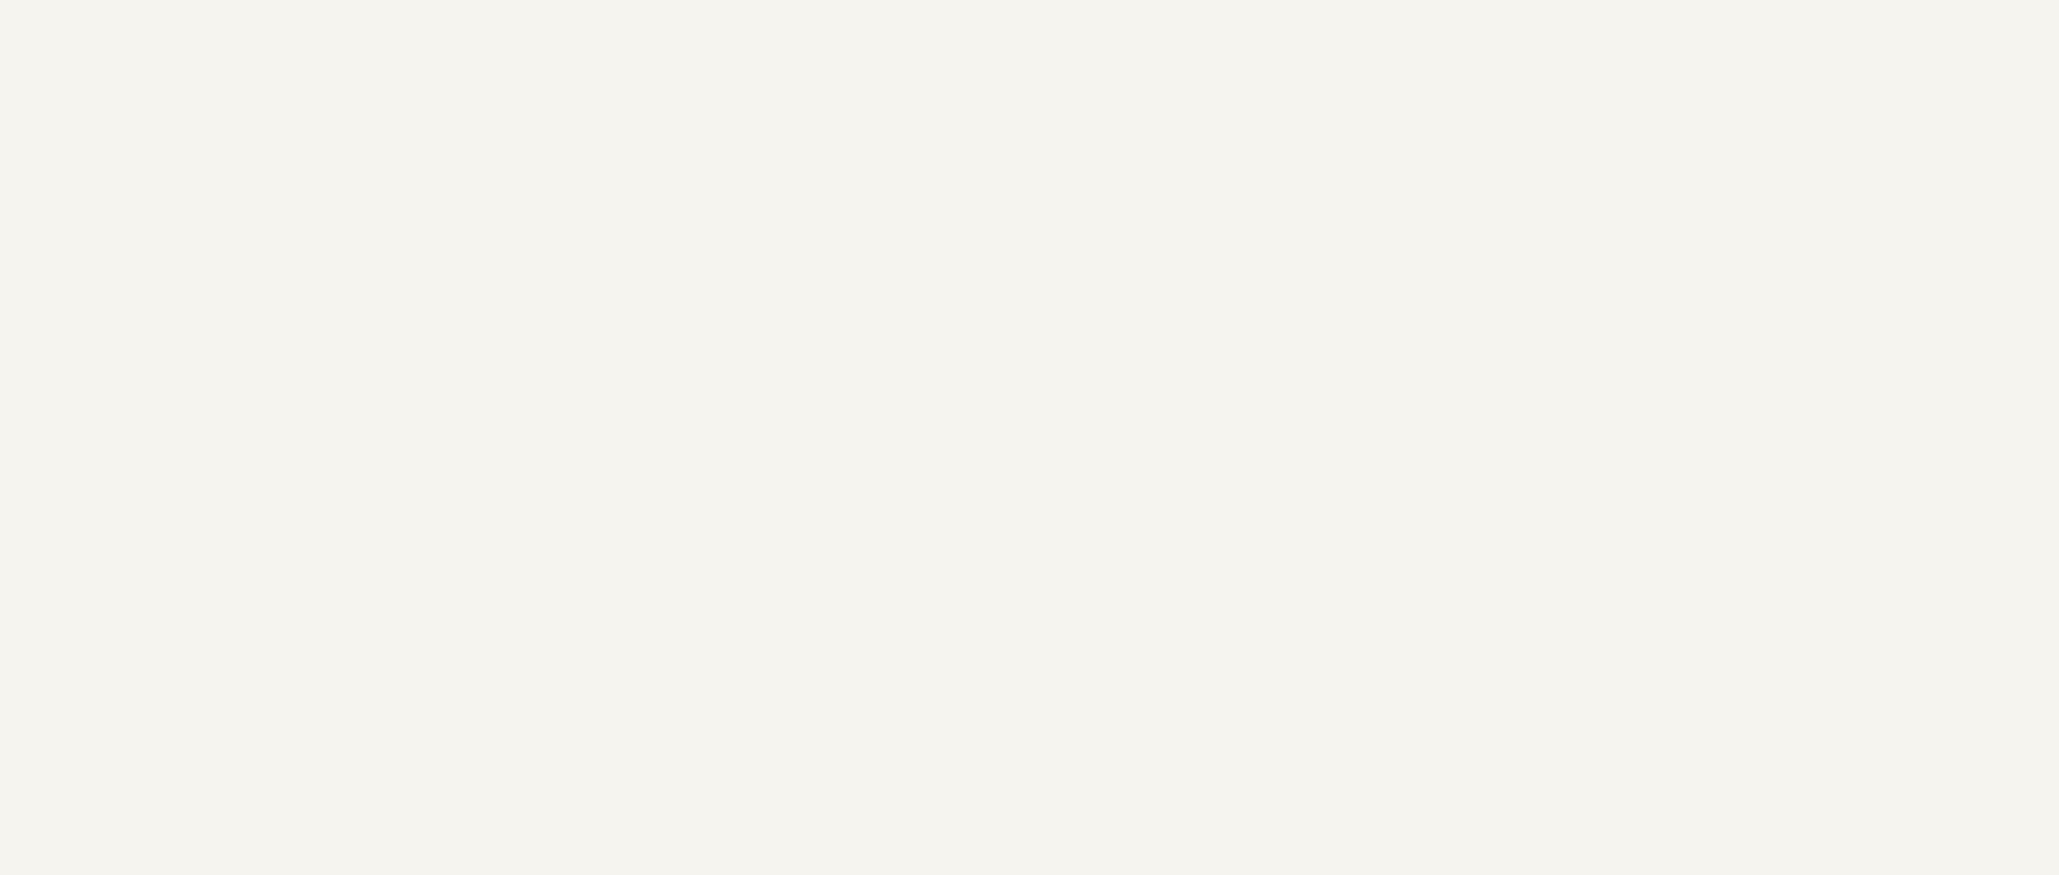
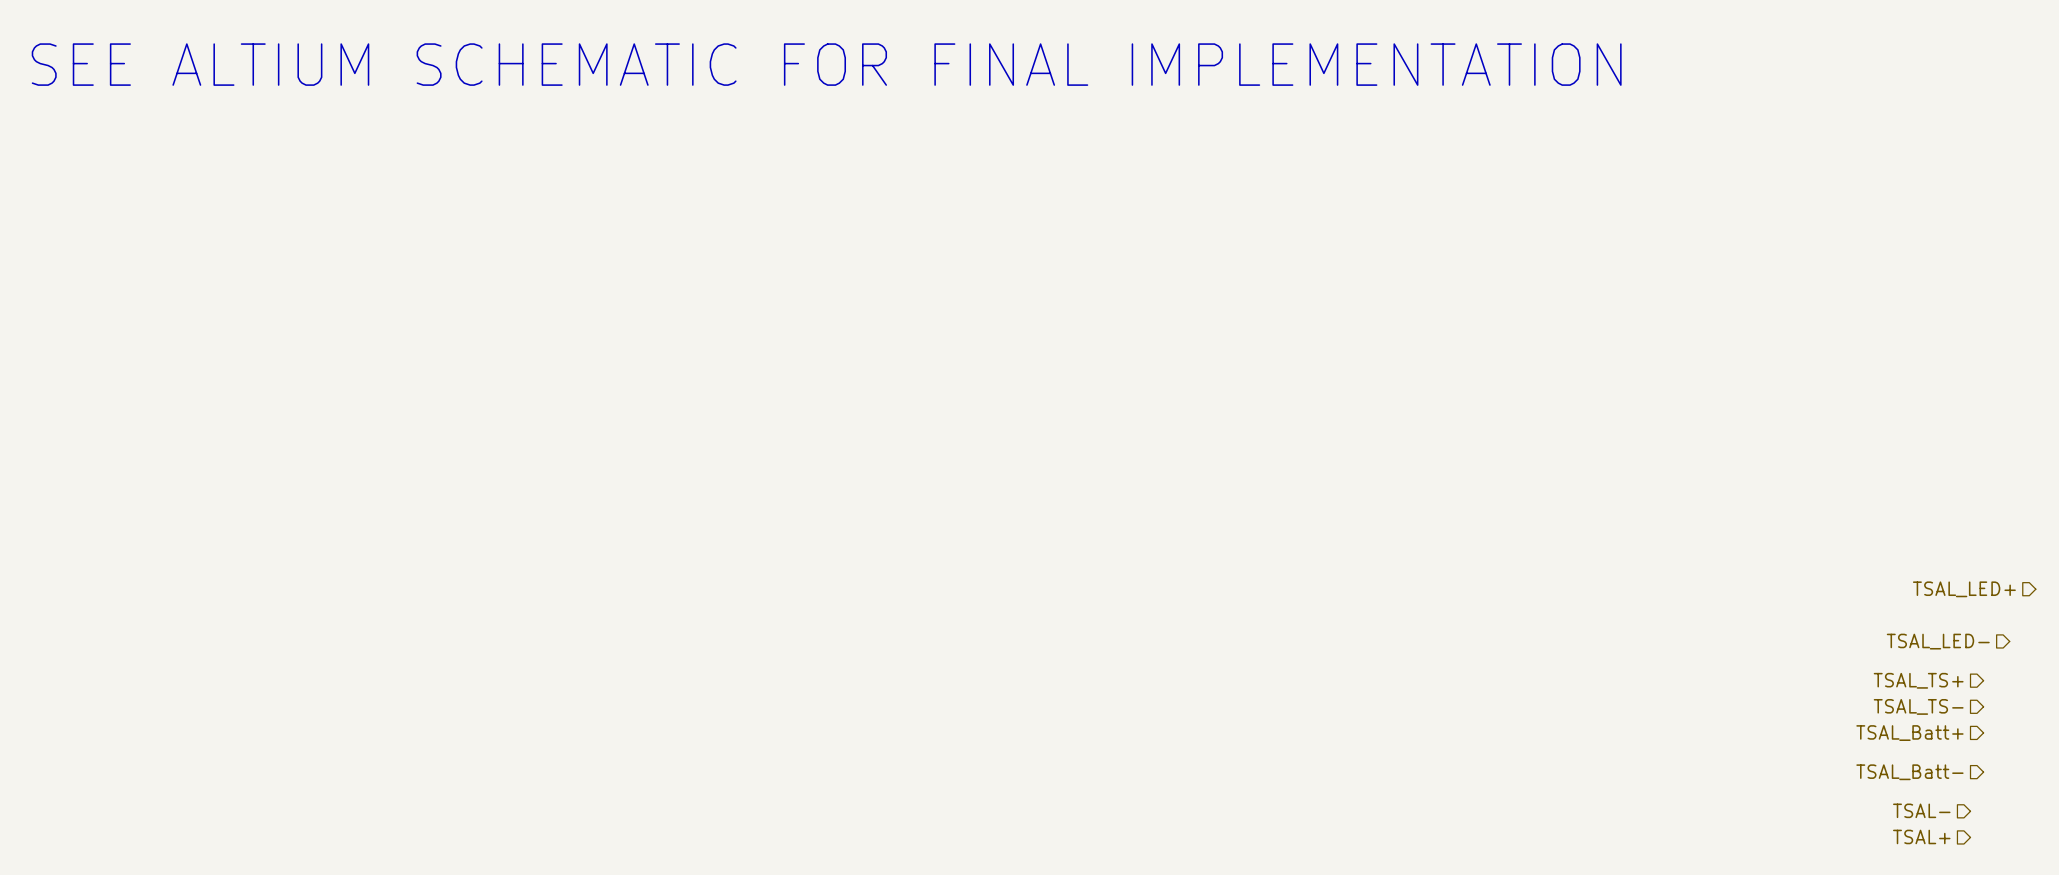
text: none -> SEE ALTIUM SCHEMATIC FOR FINAL IMPLEMENTATION (826, 64)
hierarchical label: none -> TSAL_LED+ (1964, 589)
hierarchical label: none -> TSAL_LED- (1938, 641)
hierarchical label: none -> TSAL_TS+ (1918, 680)
hierarchical label: none -> TSAL_TS- (1918, 706)
hierarchical label: none -> TSAL_Batt+ (1909, 733)
hierarchical label: none -> TSAL_Batt- (1909, 772)
hierarchical label: none -> TSAL- (1921, 810)
hierarchical label: none -> TSAL+ (1921, 836)

